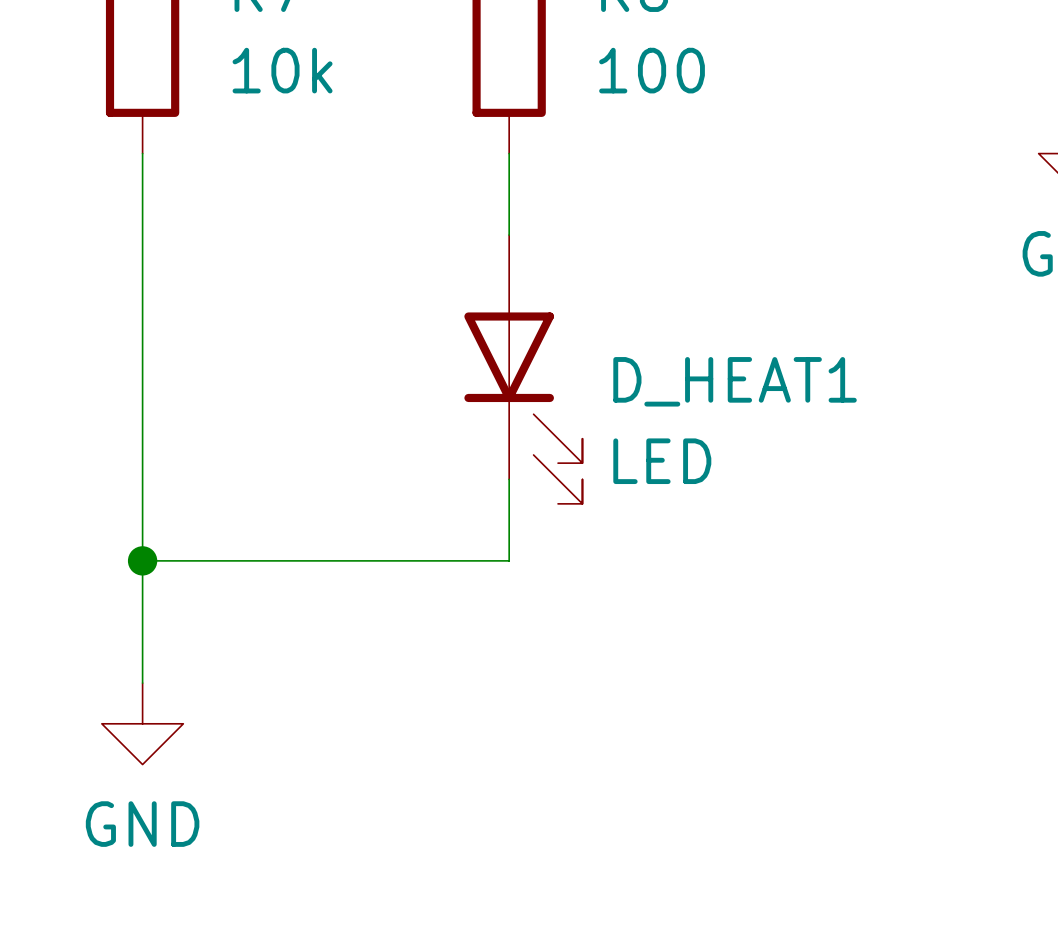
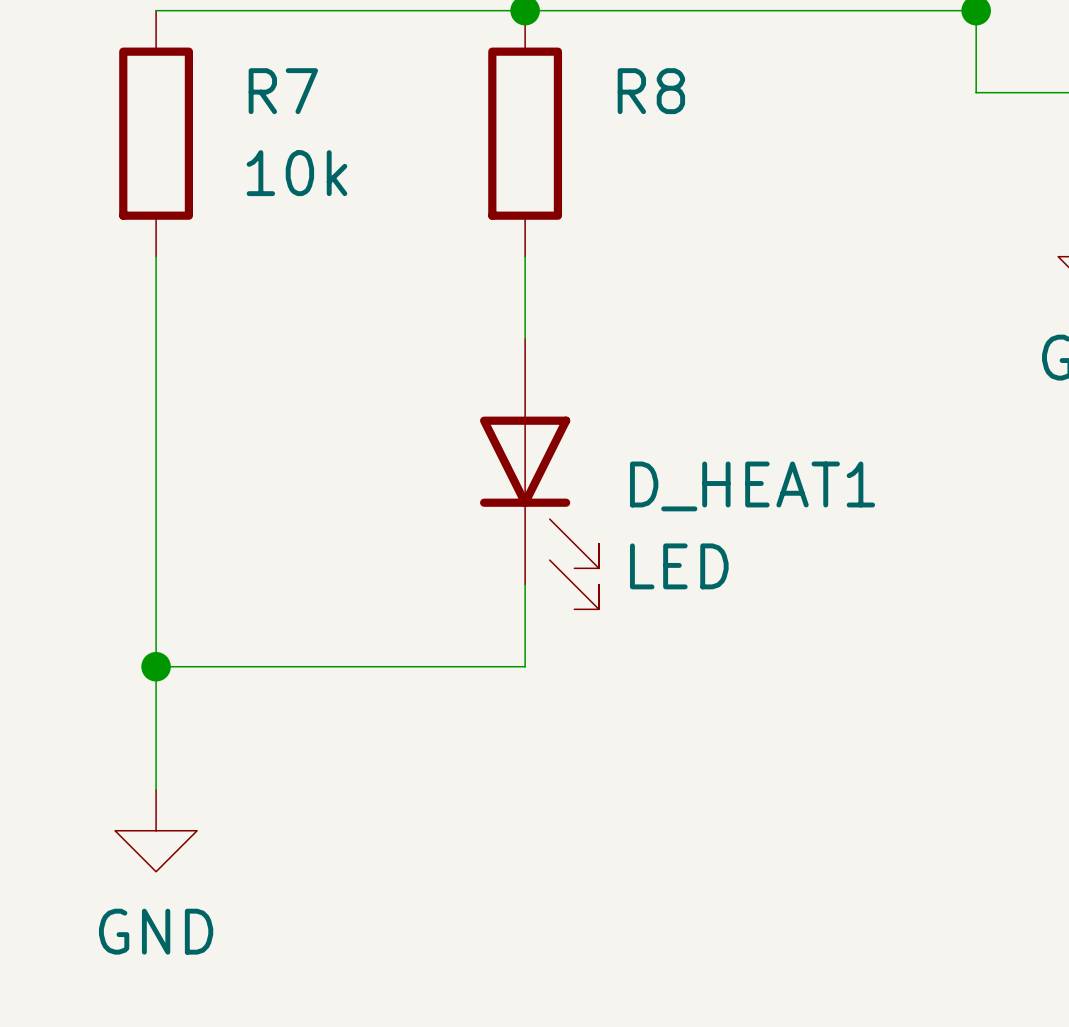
R8 value: 100 (652, 70) -> none

